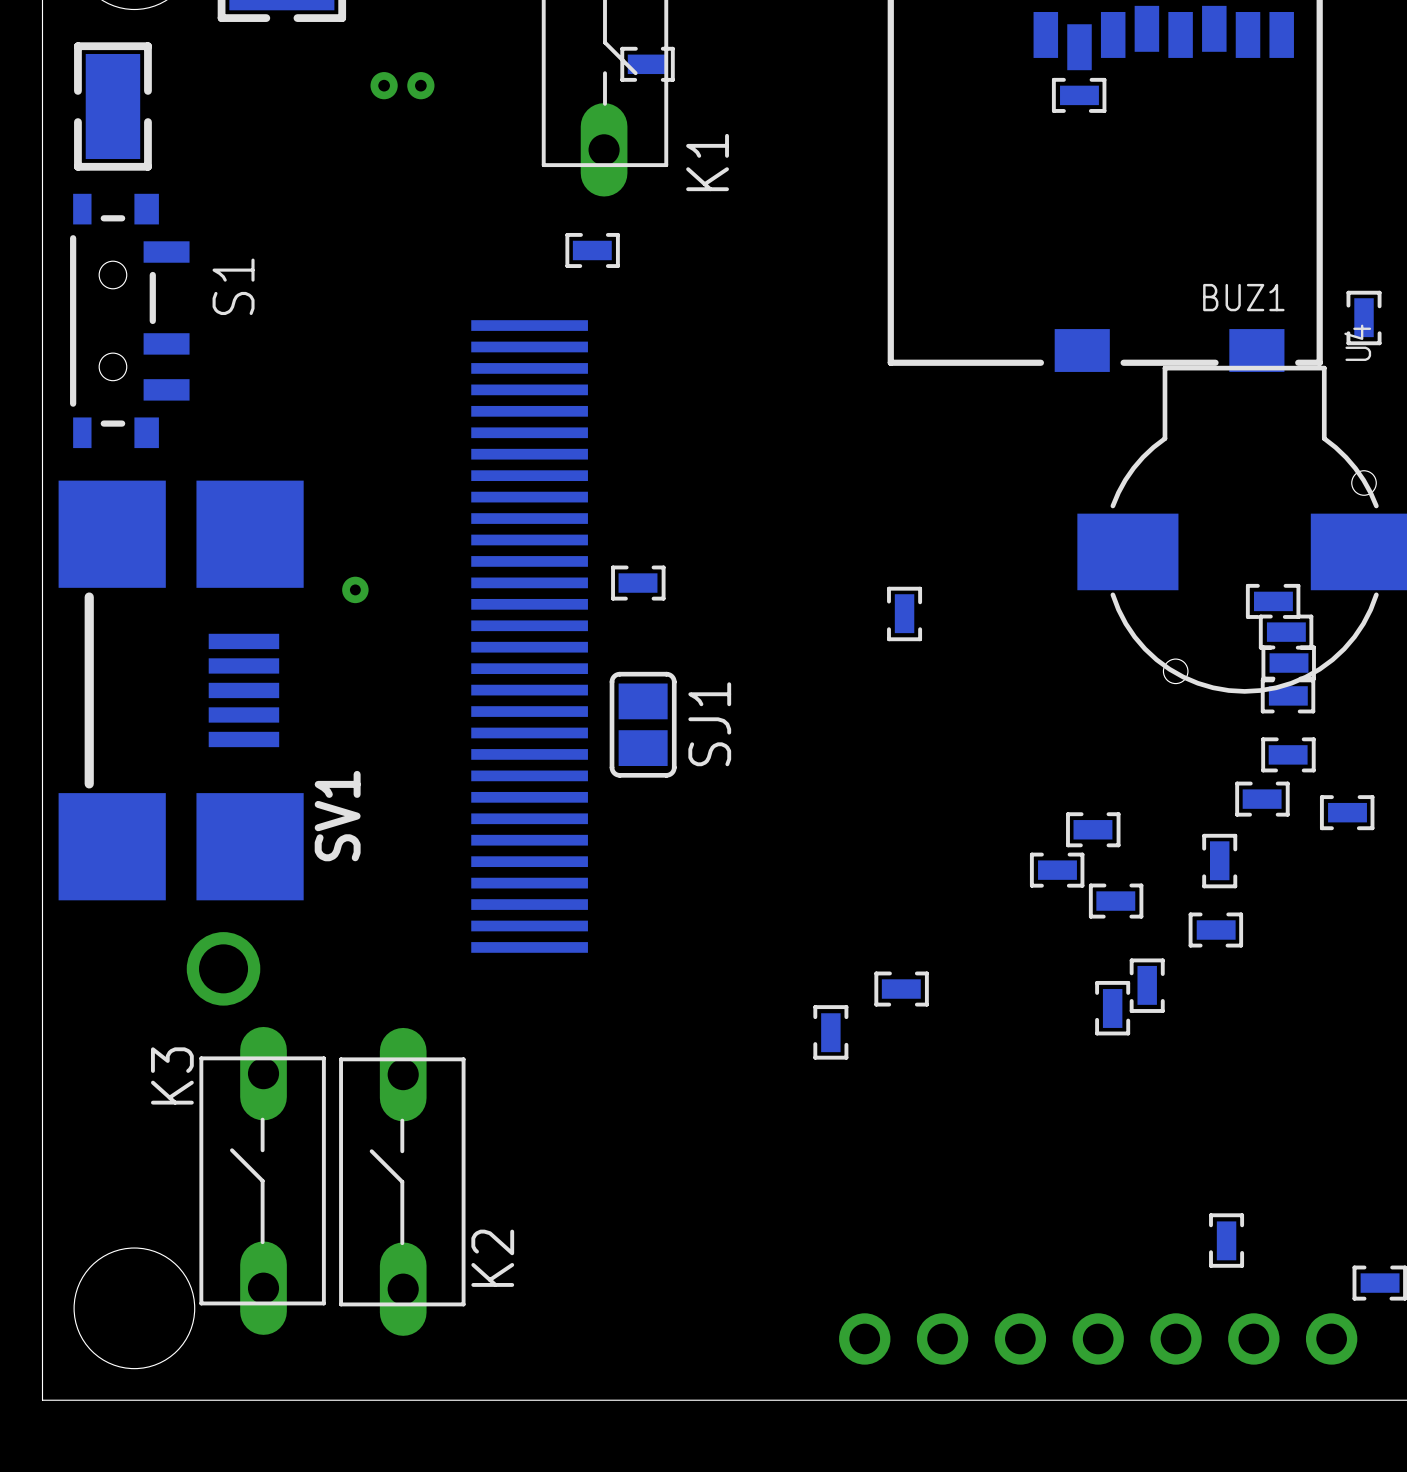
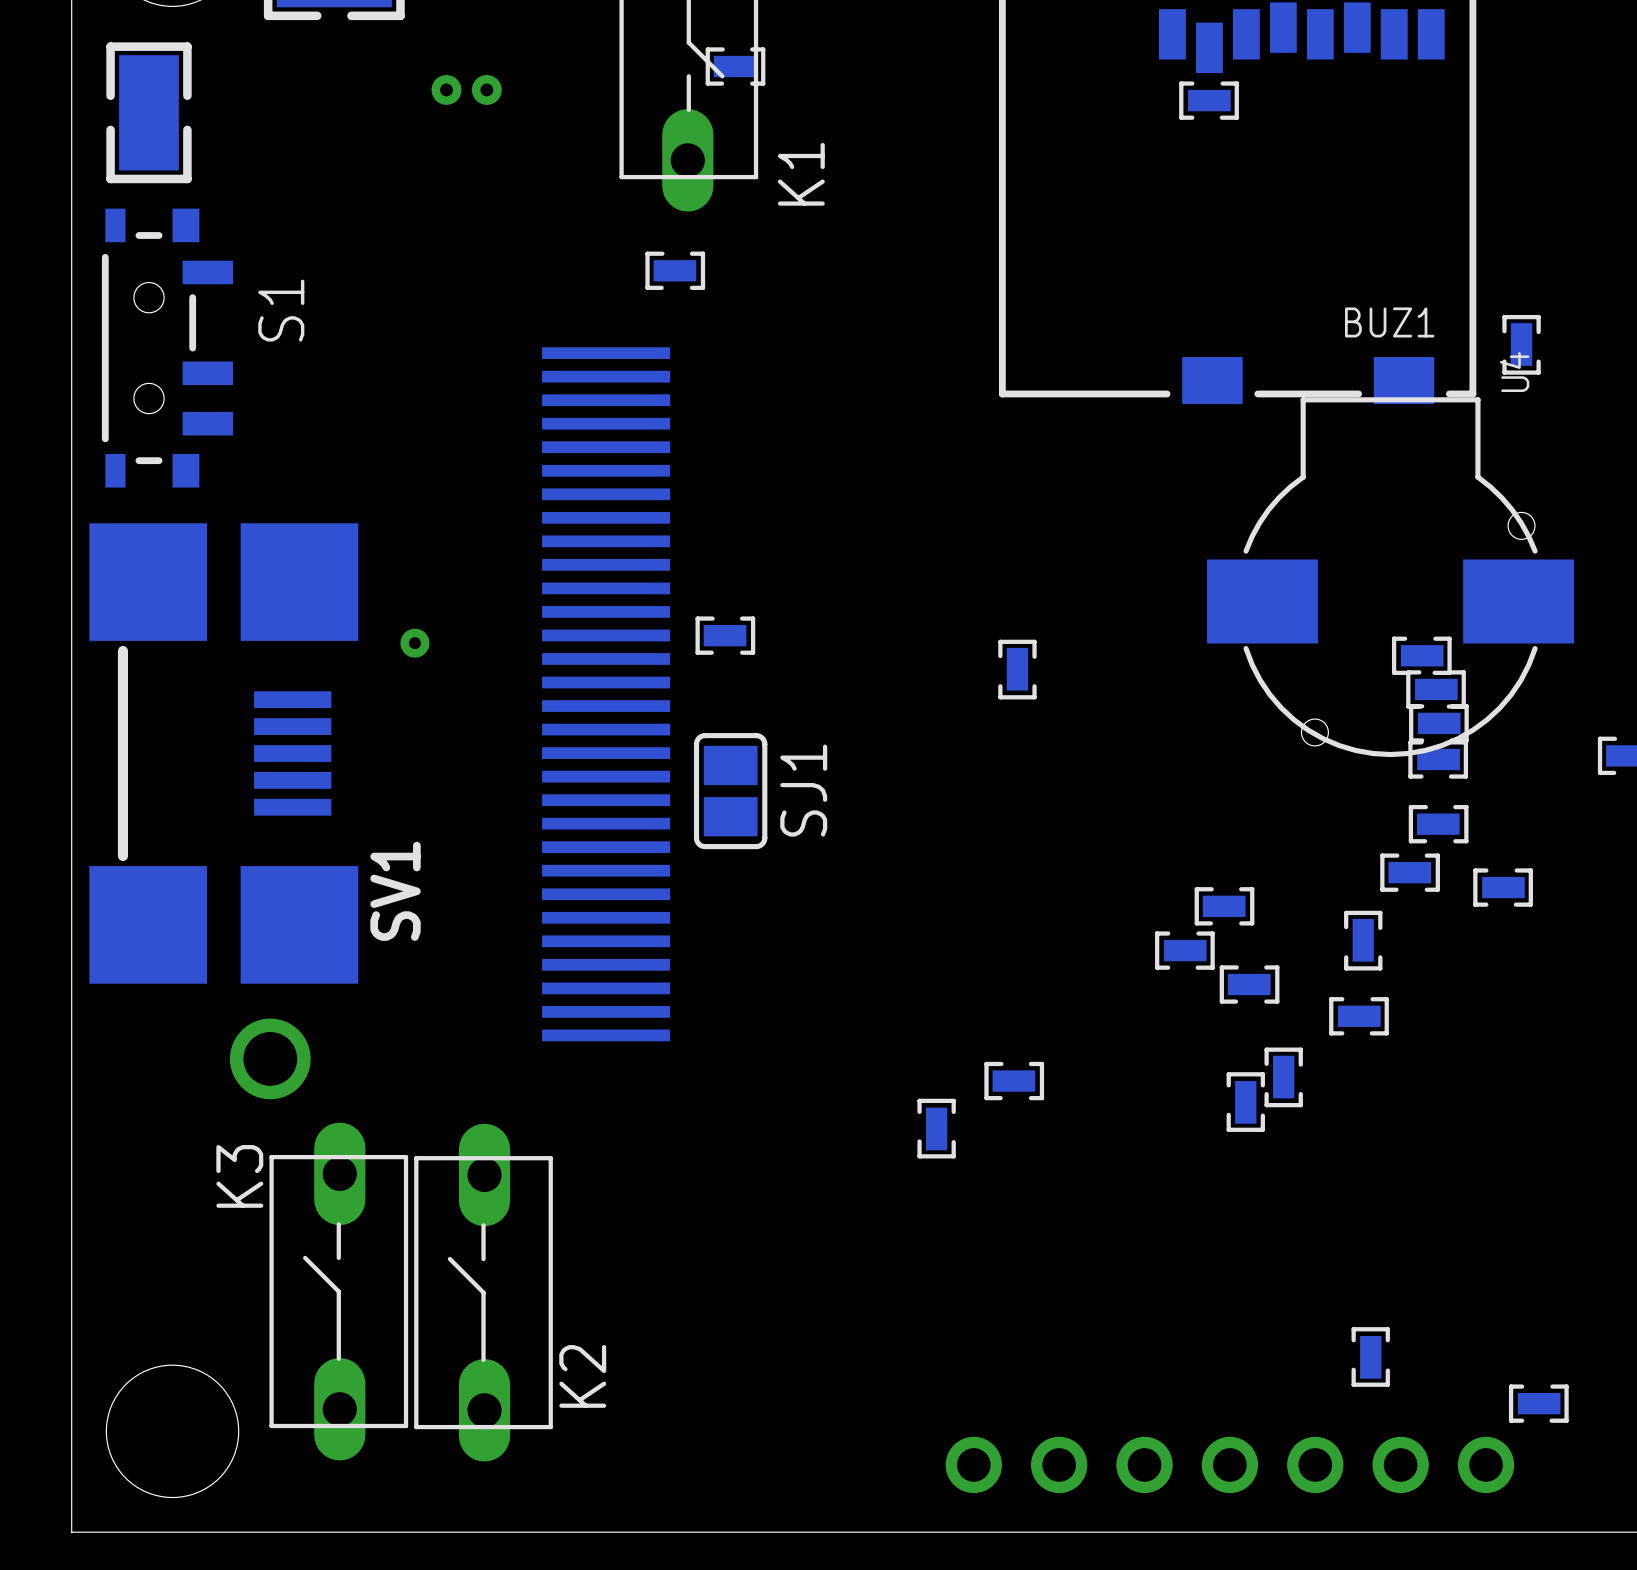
K3 position: (262, 1180) -> (338, 1291)
K2 position: (402, 1181) -> (483, 1292)

